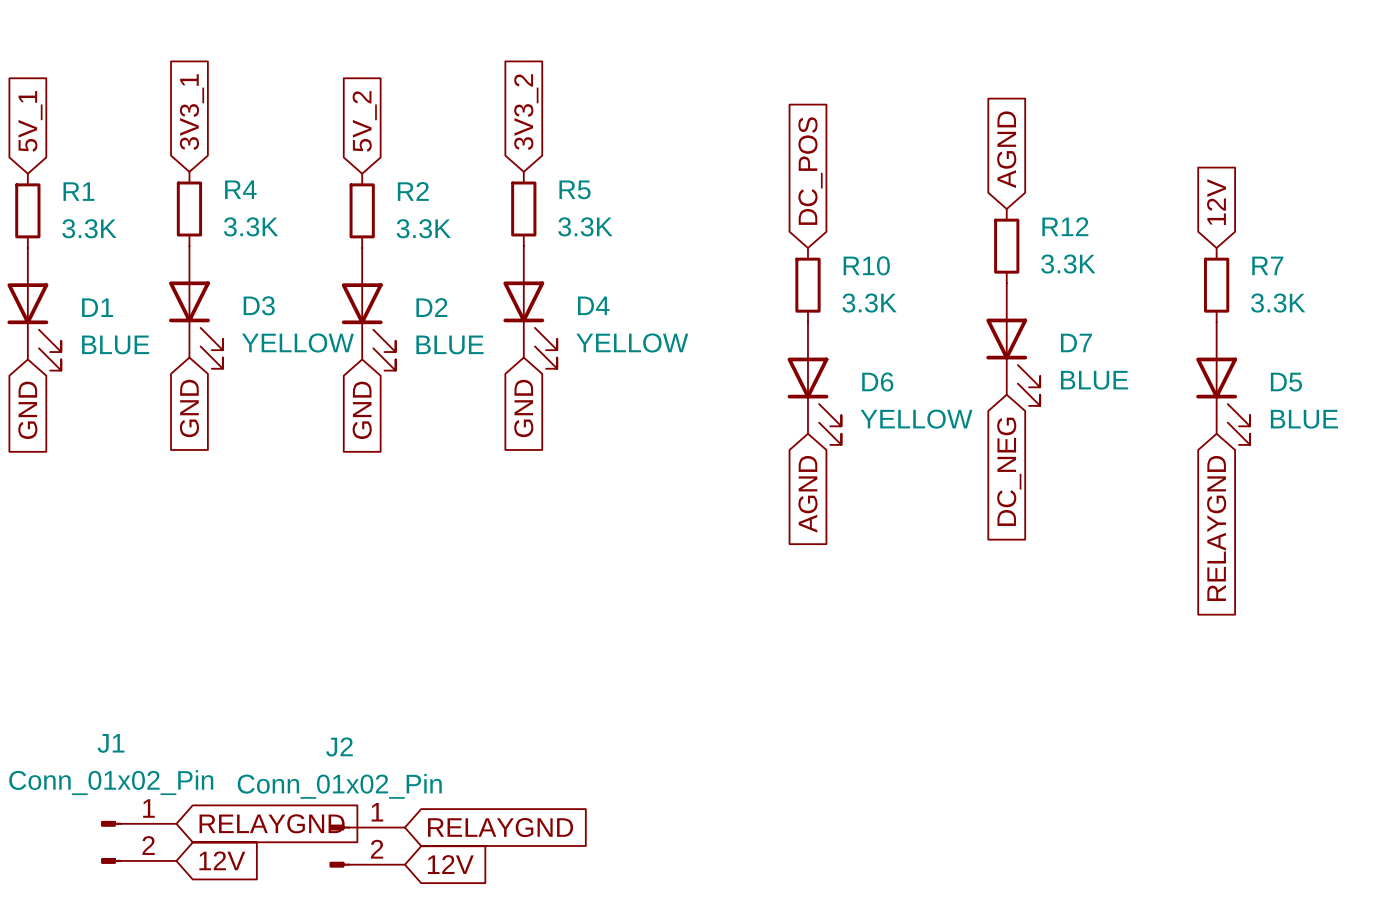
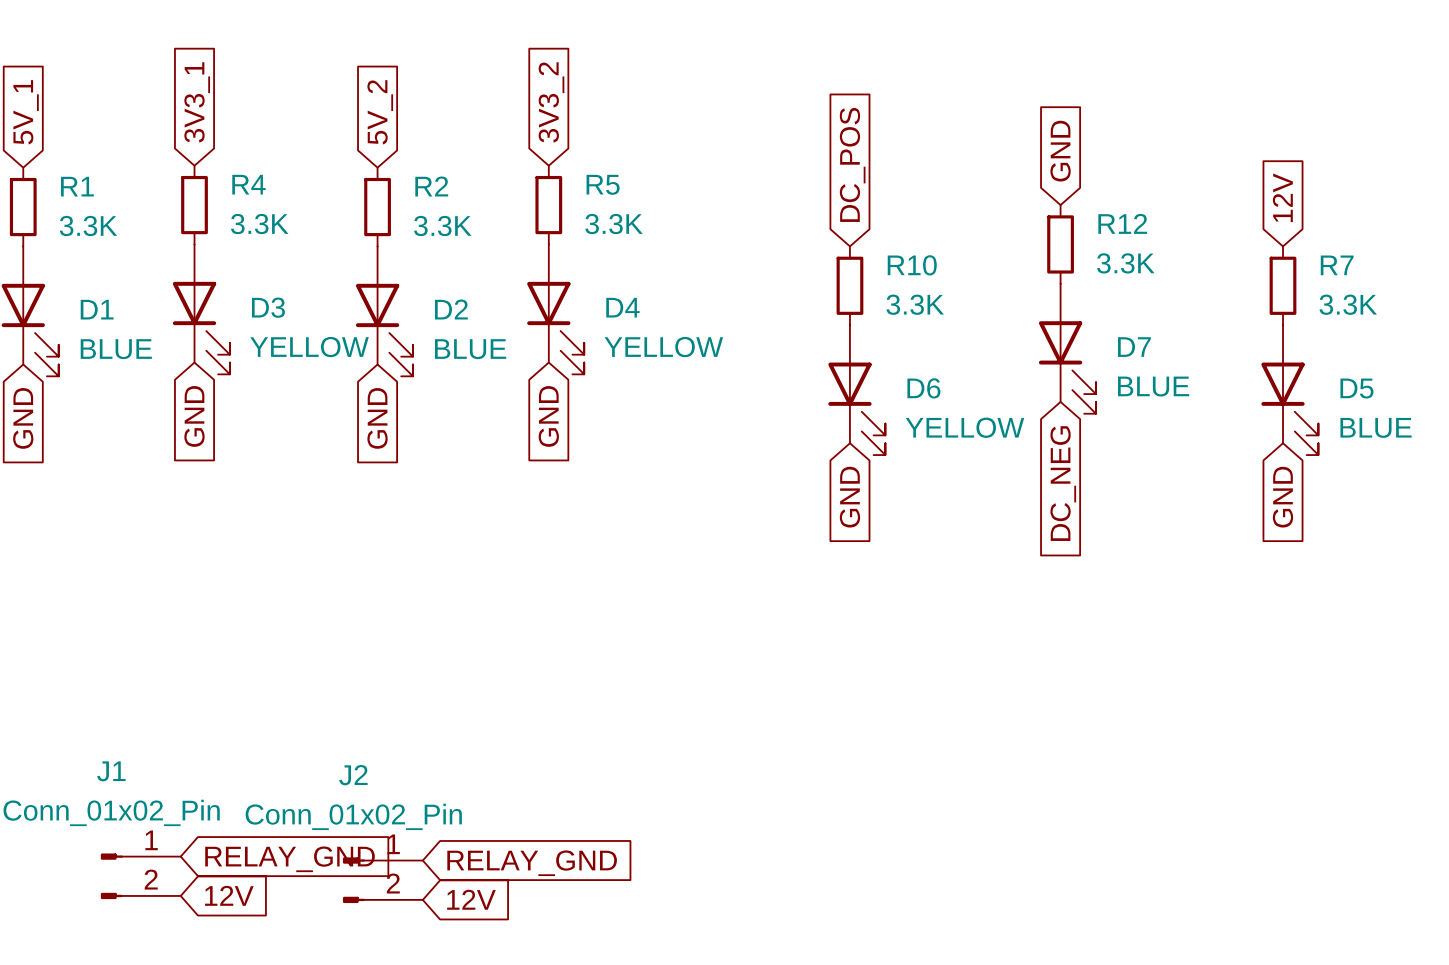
global label: AGND (1006, 149) -> GND (1060, 151)
global label: AGND (807, 494) -> GND (849, 497)
global label: RELAYGND (1216, 528) -> GND (1282, 497)
global label: RELAYGND (272, 823) -> RELAY_GND (290, 859)
global label: RELAYGND (500, 827) -> RELAY_GND (532, 863)

